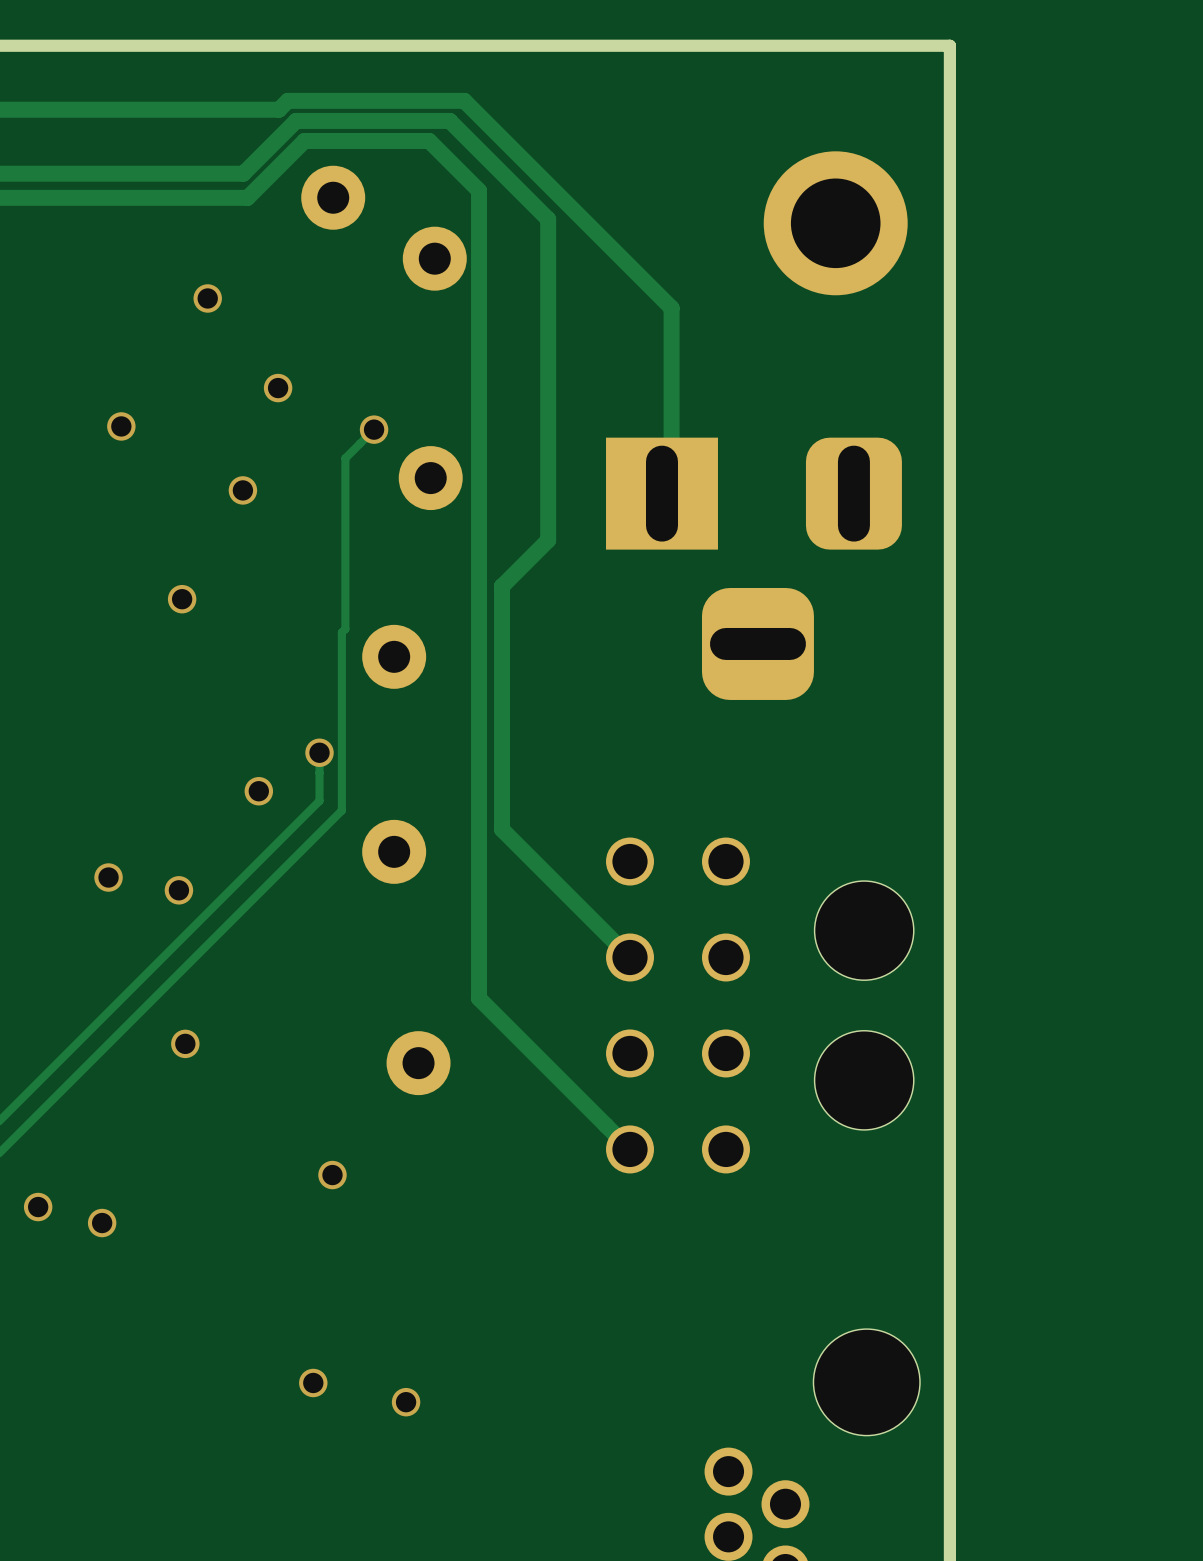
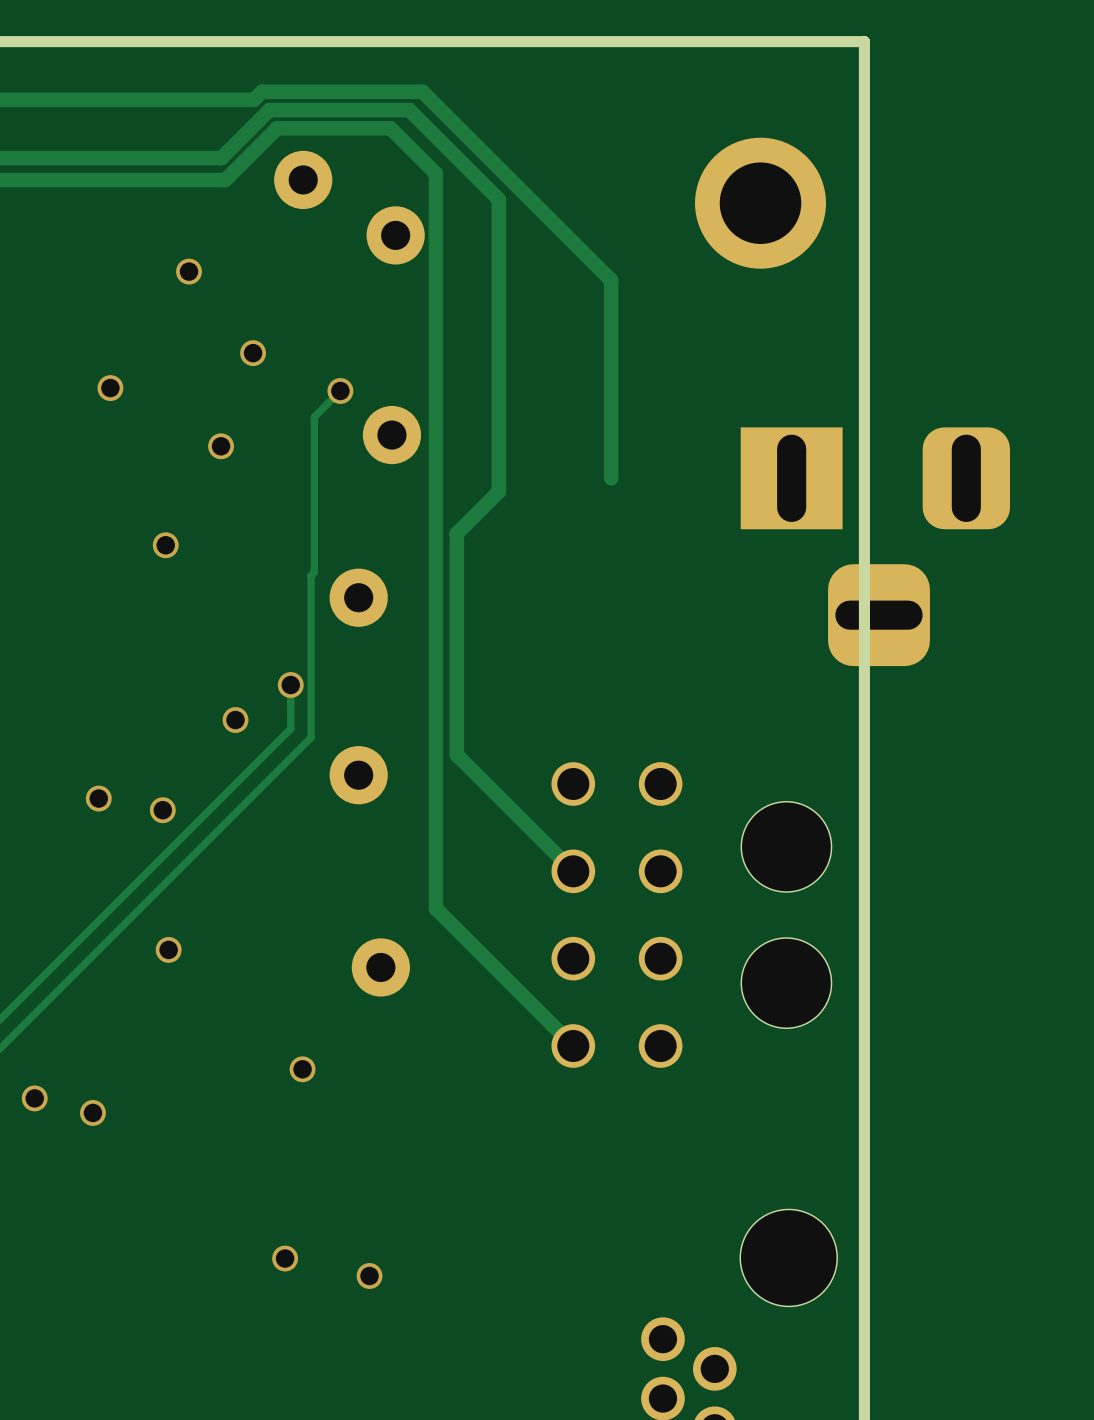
part position: (753, 568) -> (875, 546)

